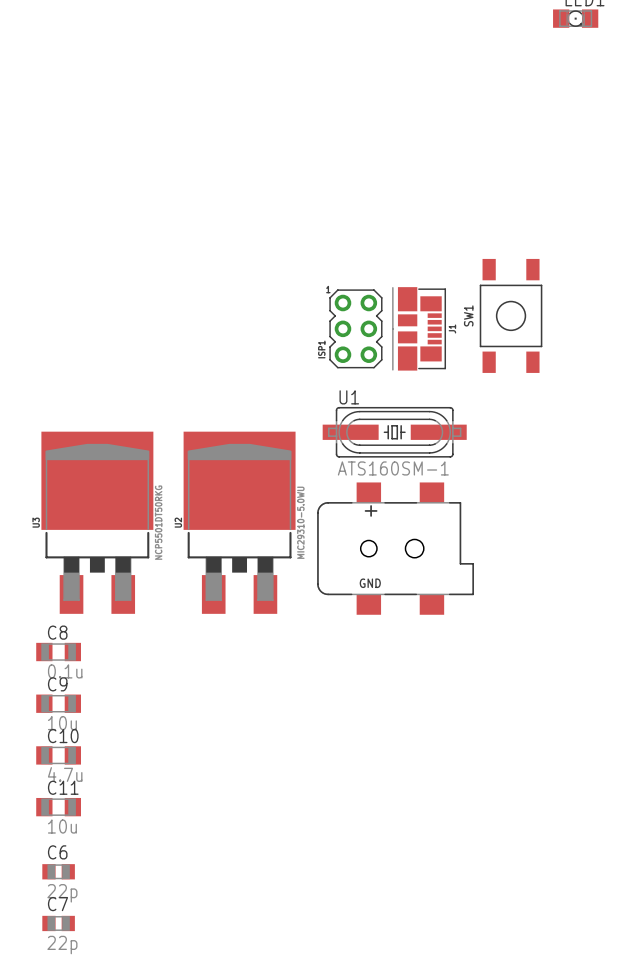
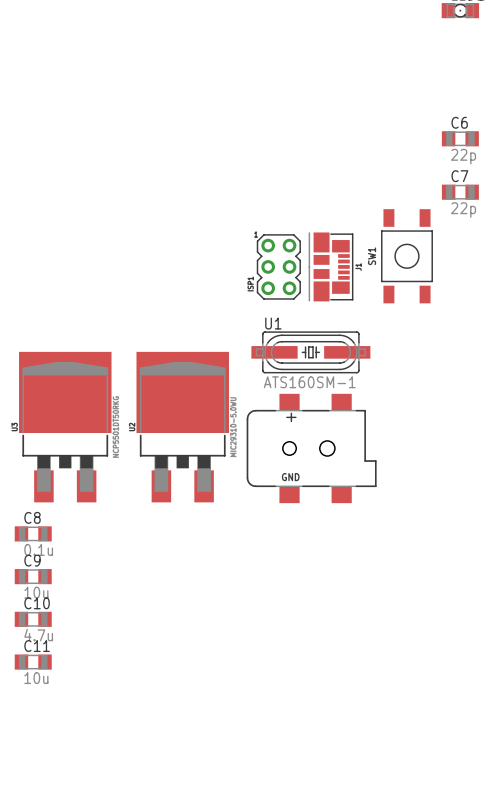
C6 footprint: [42, 864, 75, 880] -> [441, 131, 479, 147]
C7 footprint: [42, 915, 75, 932] -> [441, 184, 479, 200]

